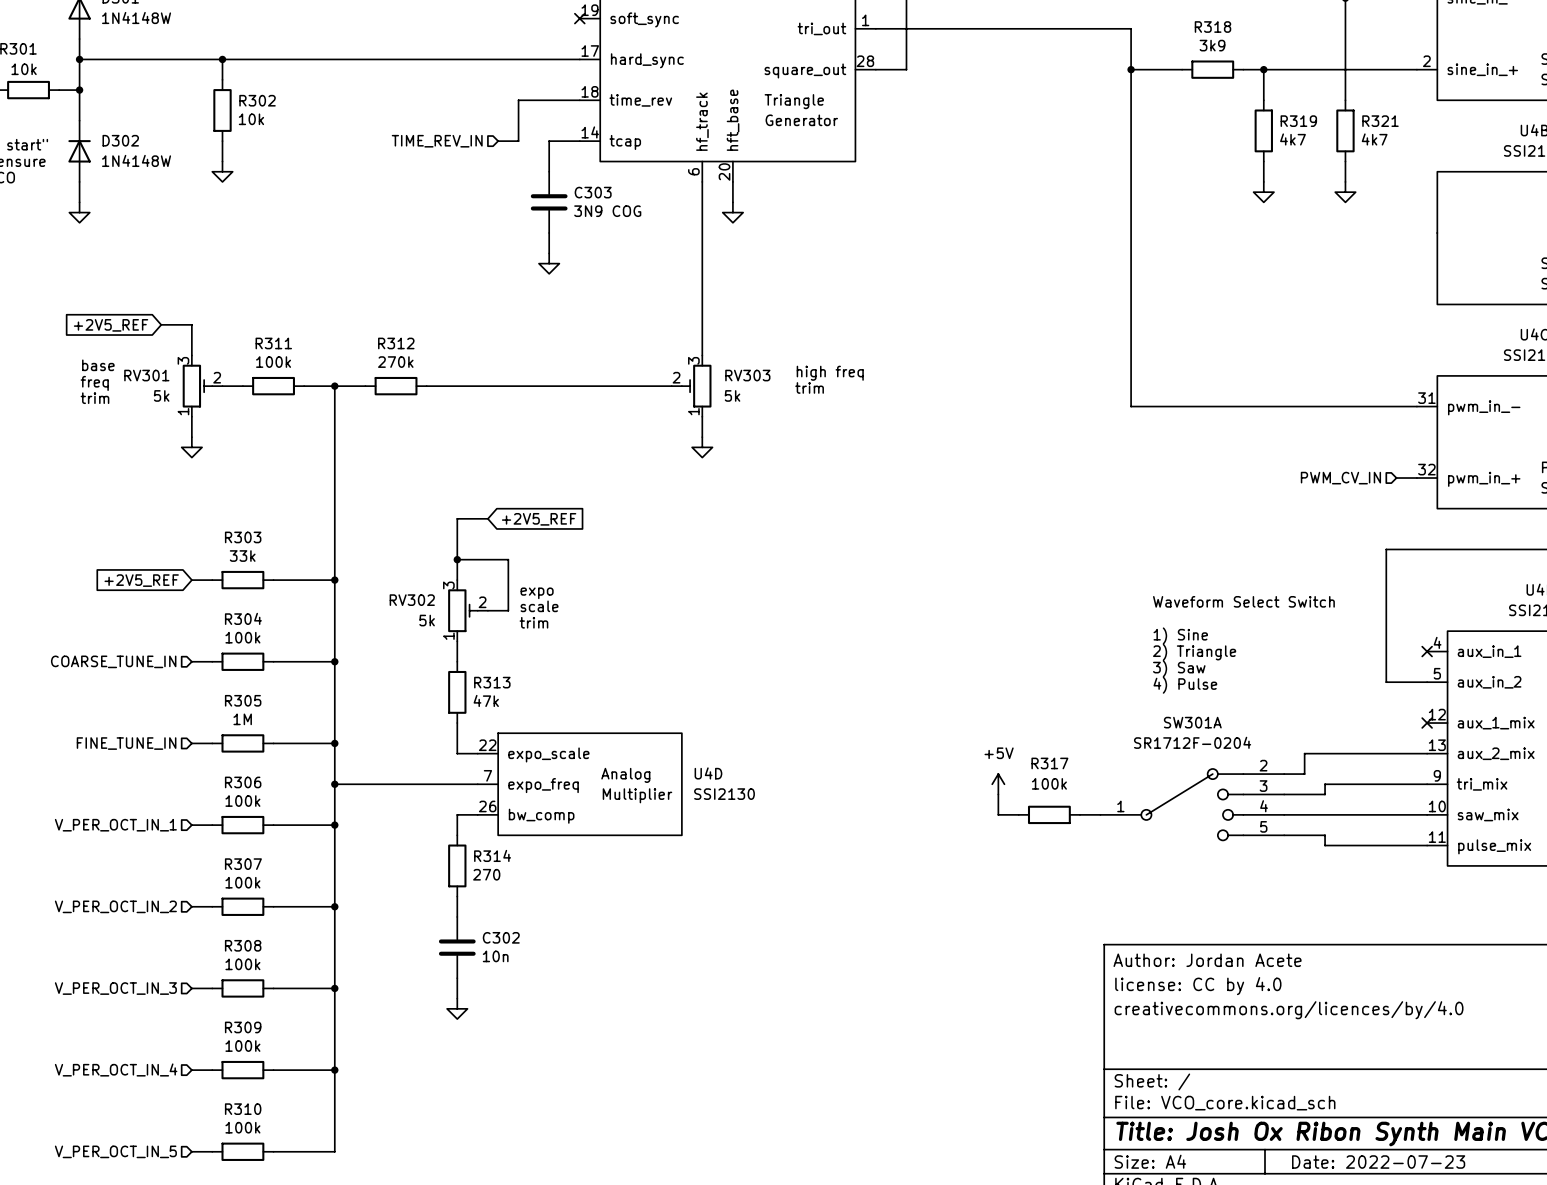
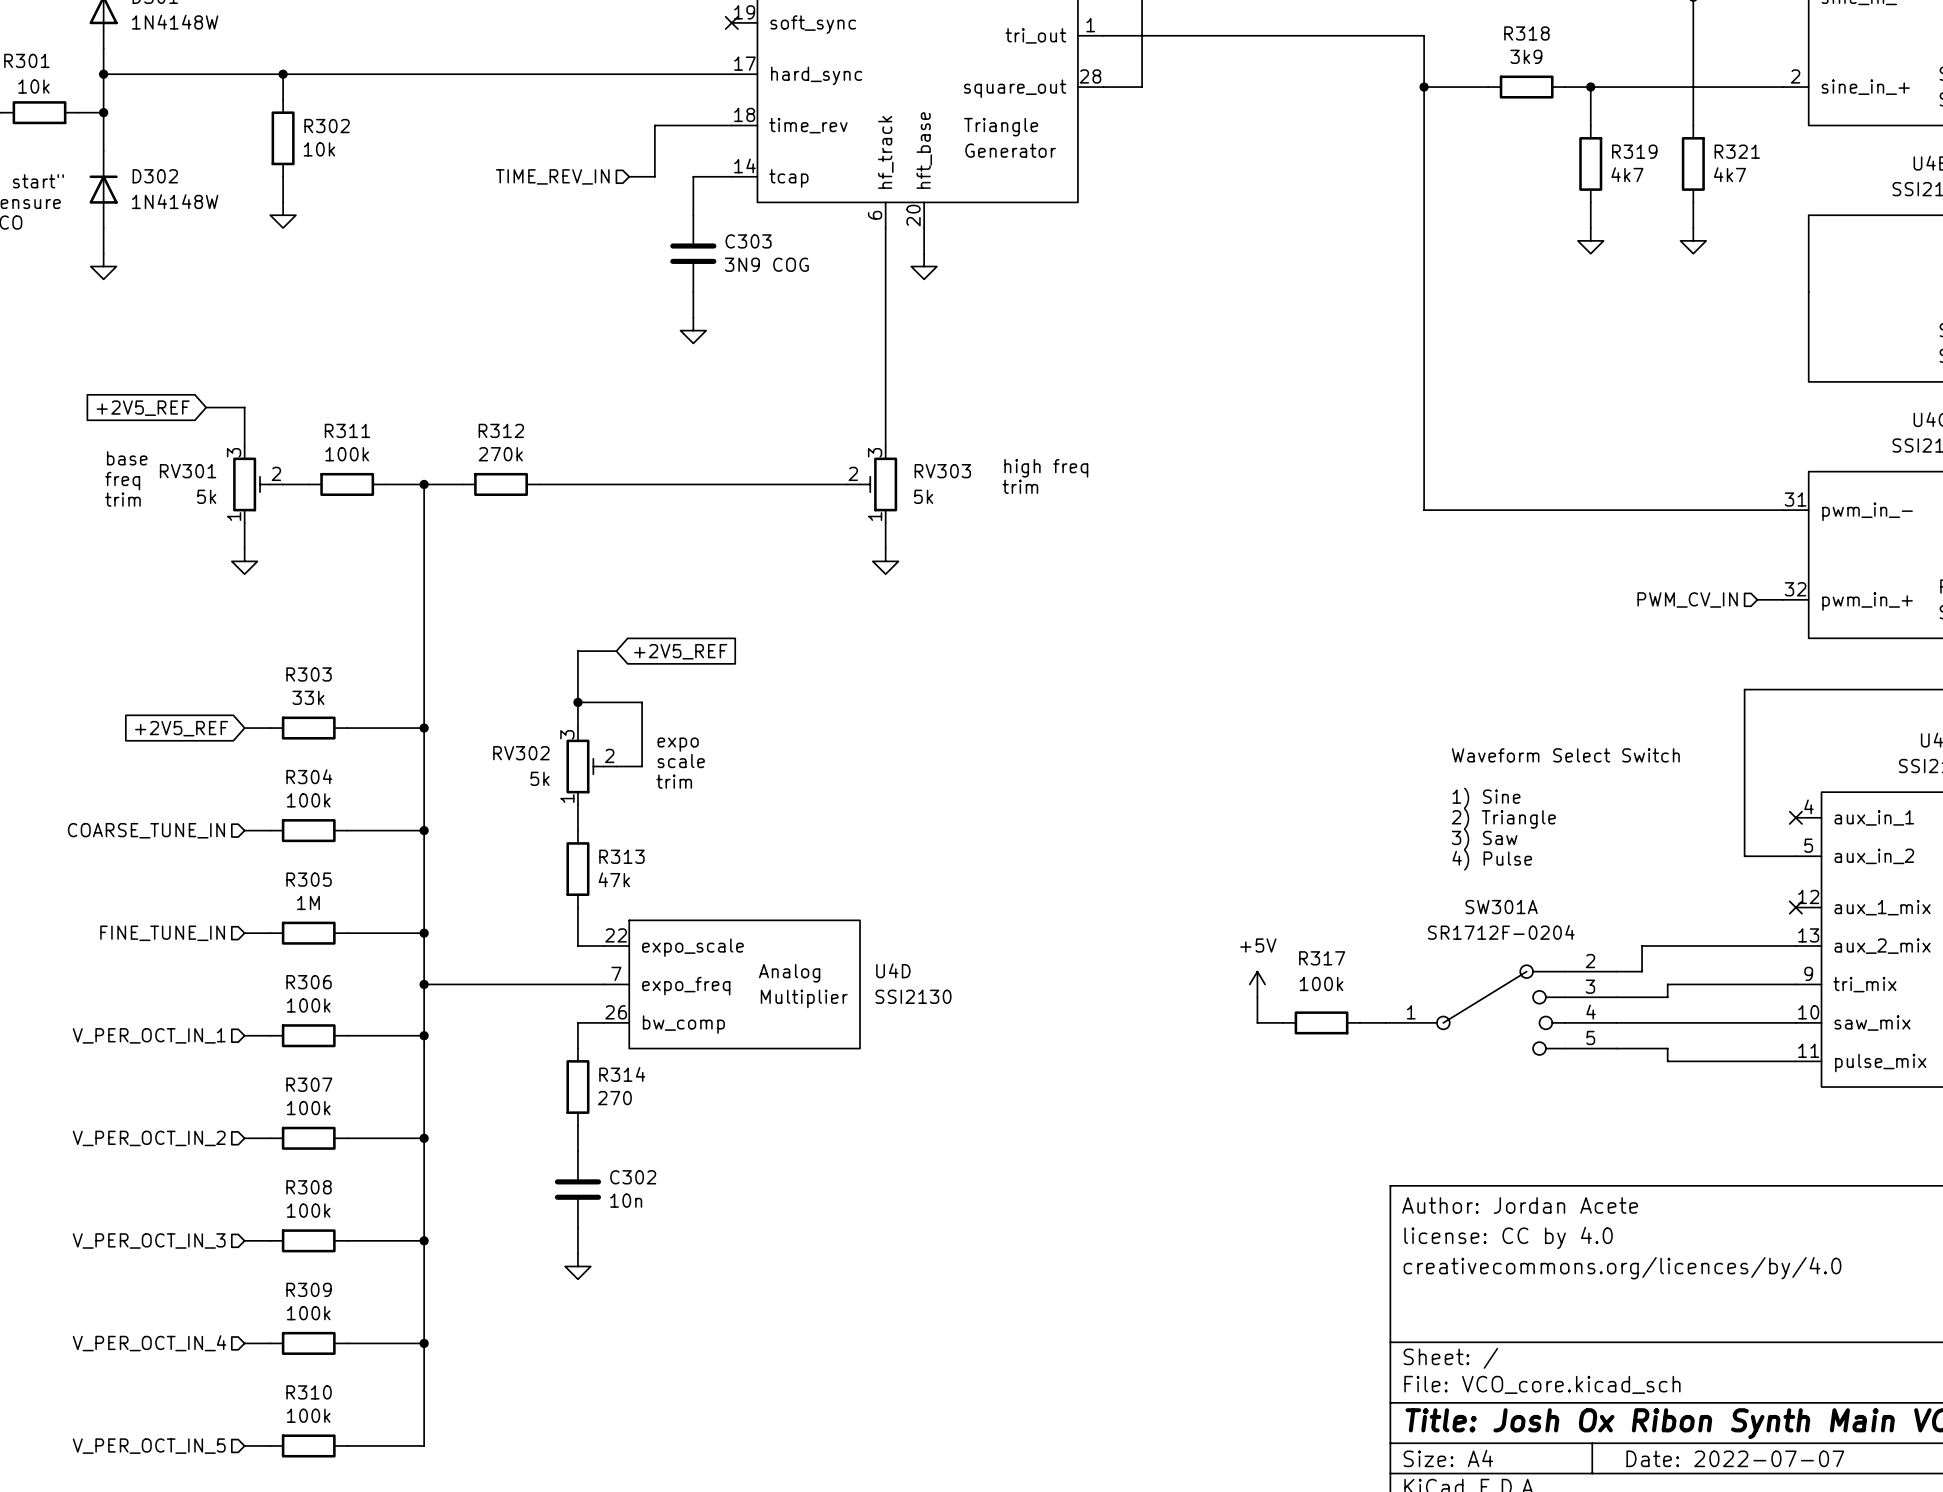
title block: Date: 2022-07-23 (1378, 1162) -> Date: 2022-07-07 (1735, 1458)

